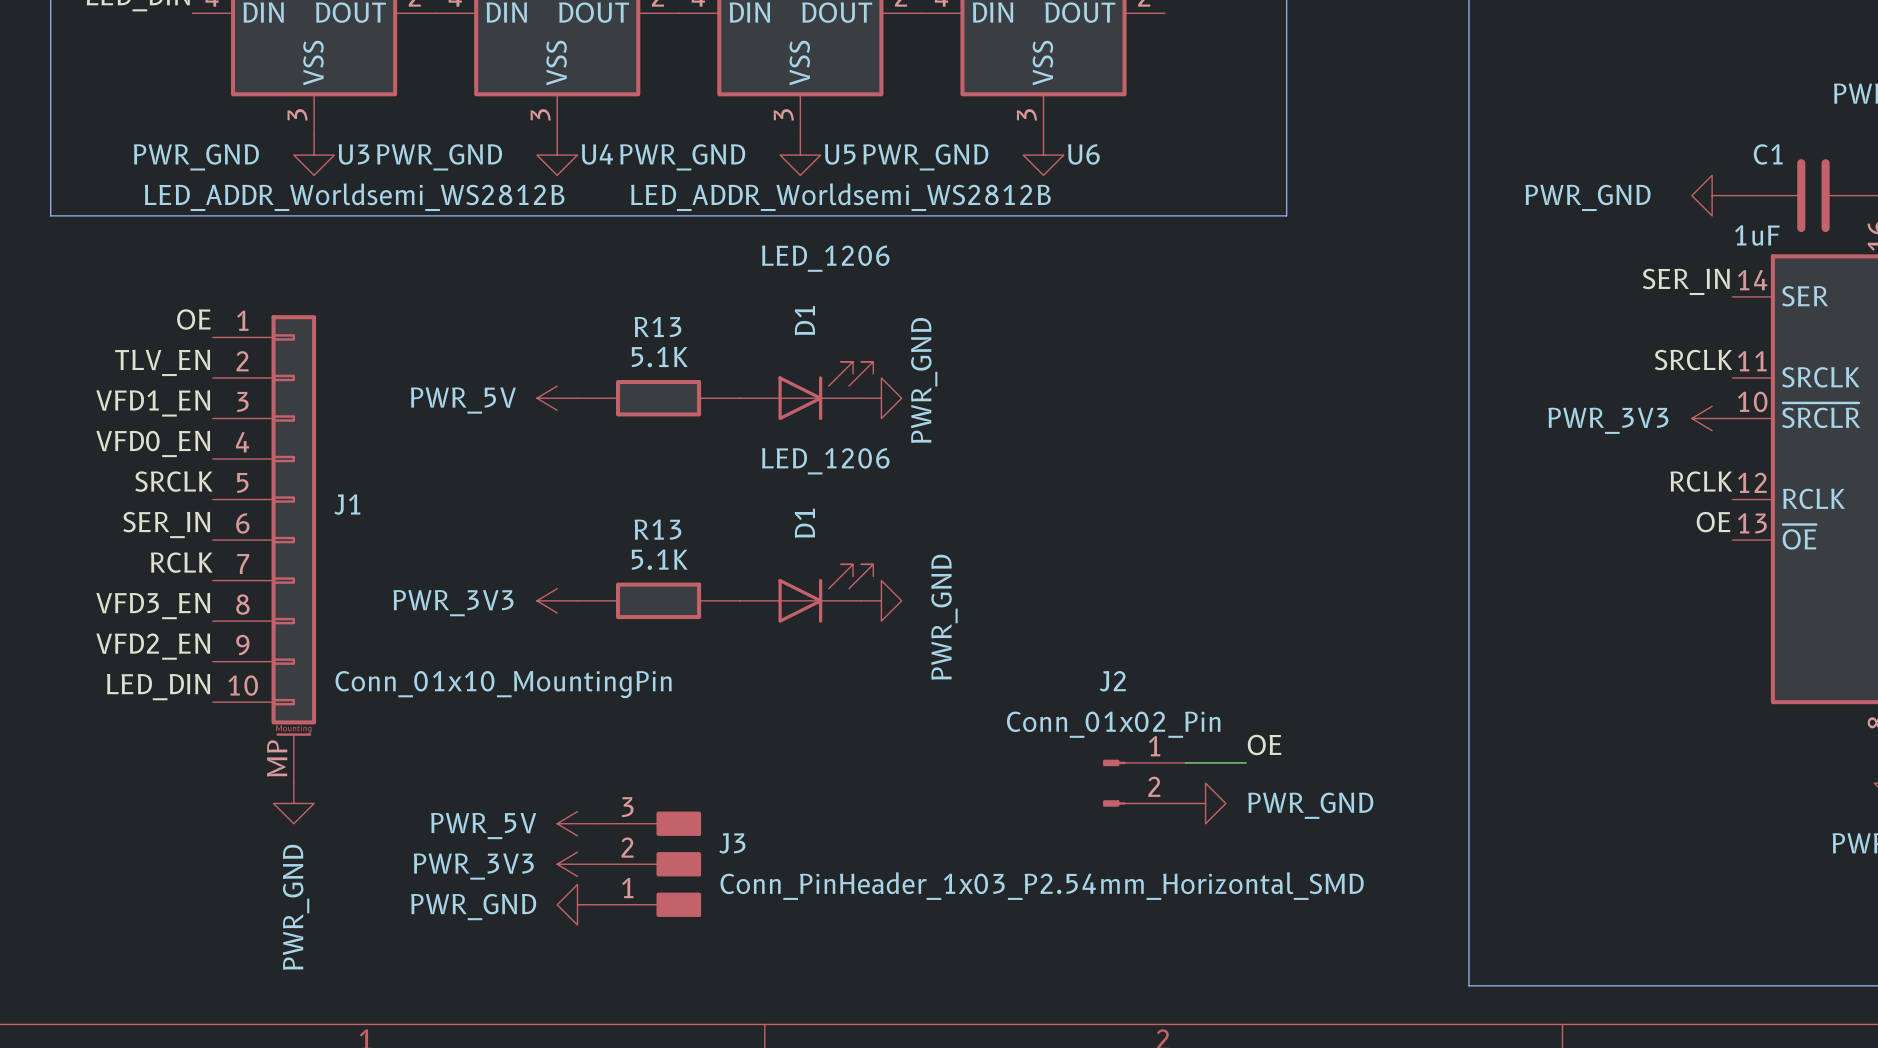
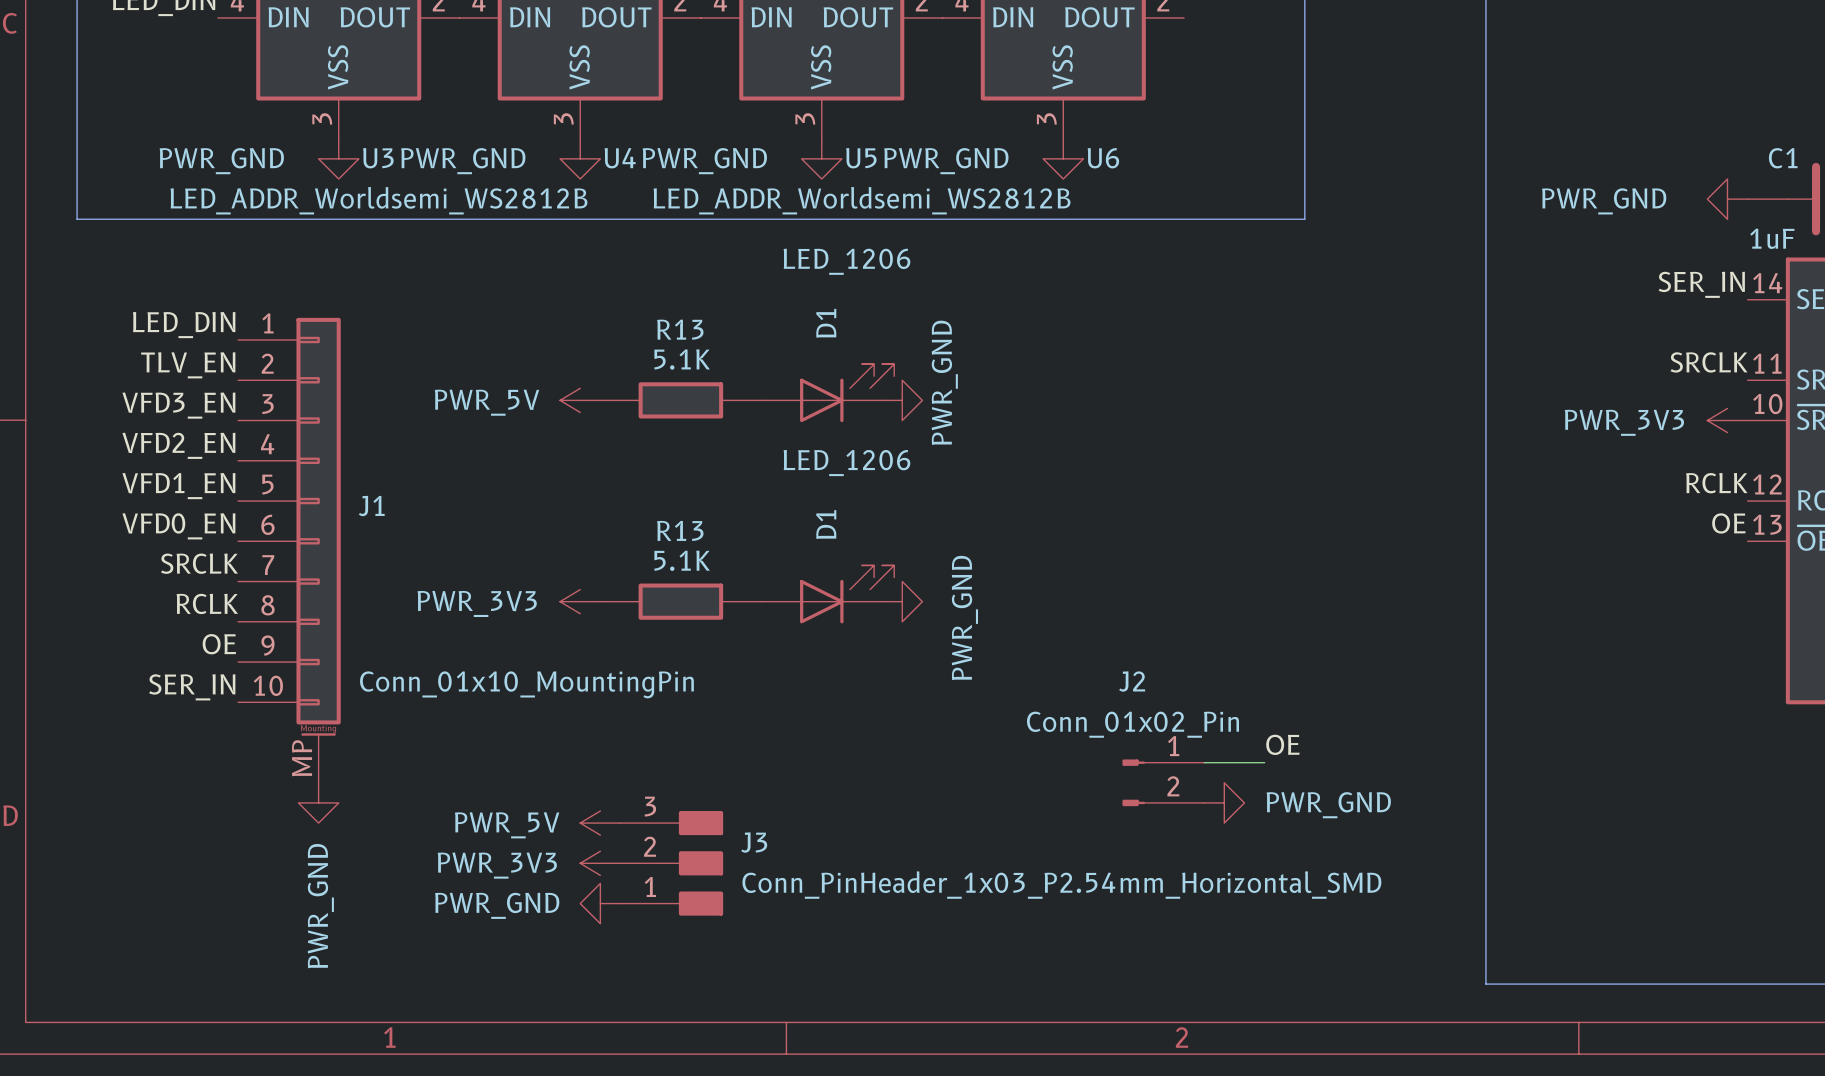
label: OE (193, 319) -> LED_DIN (184, 325)
label: VFD1_EN (153, 403) -> VFD3_EN (178, 405)
label: VFD0_EN (153, 443) -> VFD2_EN (178, 445)
label: SRCLK (173, 481) -> VFD1_EN (178, 486)
label: SER_IN (166, 525) -> VFD0_EN (178, 526)
label: RCLK (181, 562) -> SRCLK (199, 563)
label: VFD3_EN (153, 606) -> RCLK (207, 603)
label: VFD2_EN (153, 646) -> OE (219, 644)
label: LED_DIN (158, 687) -> SER_IN (192, 687)

